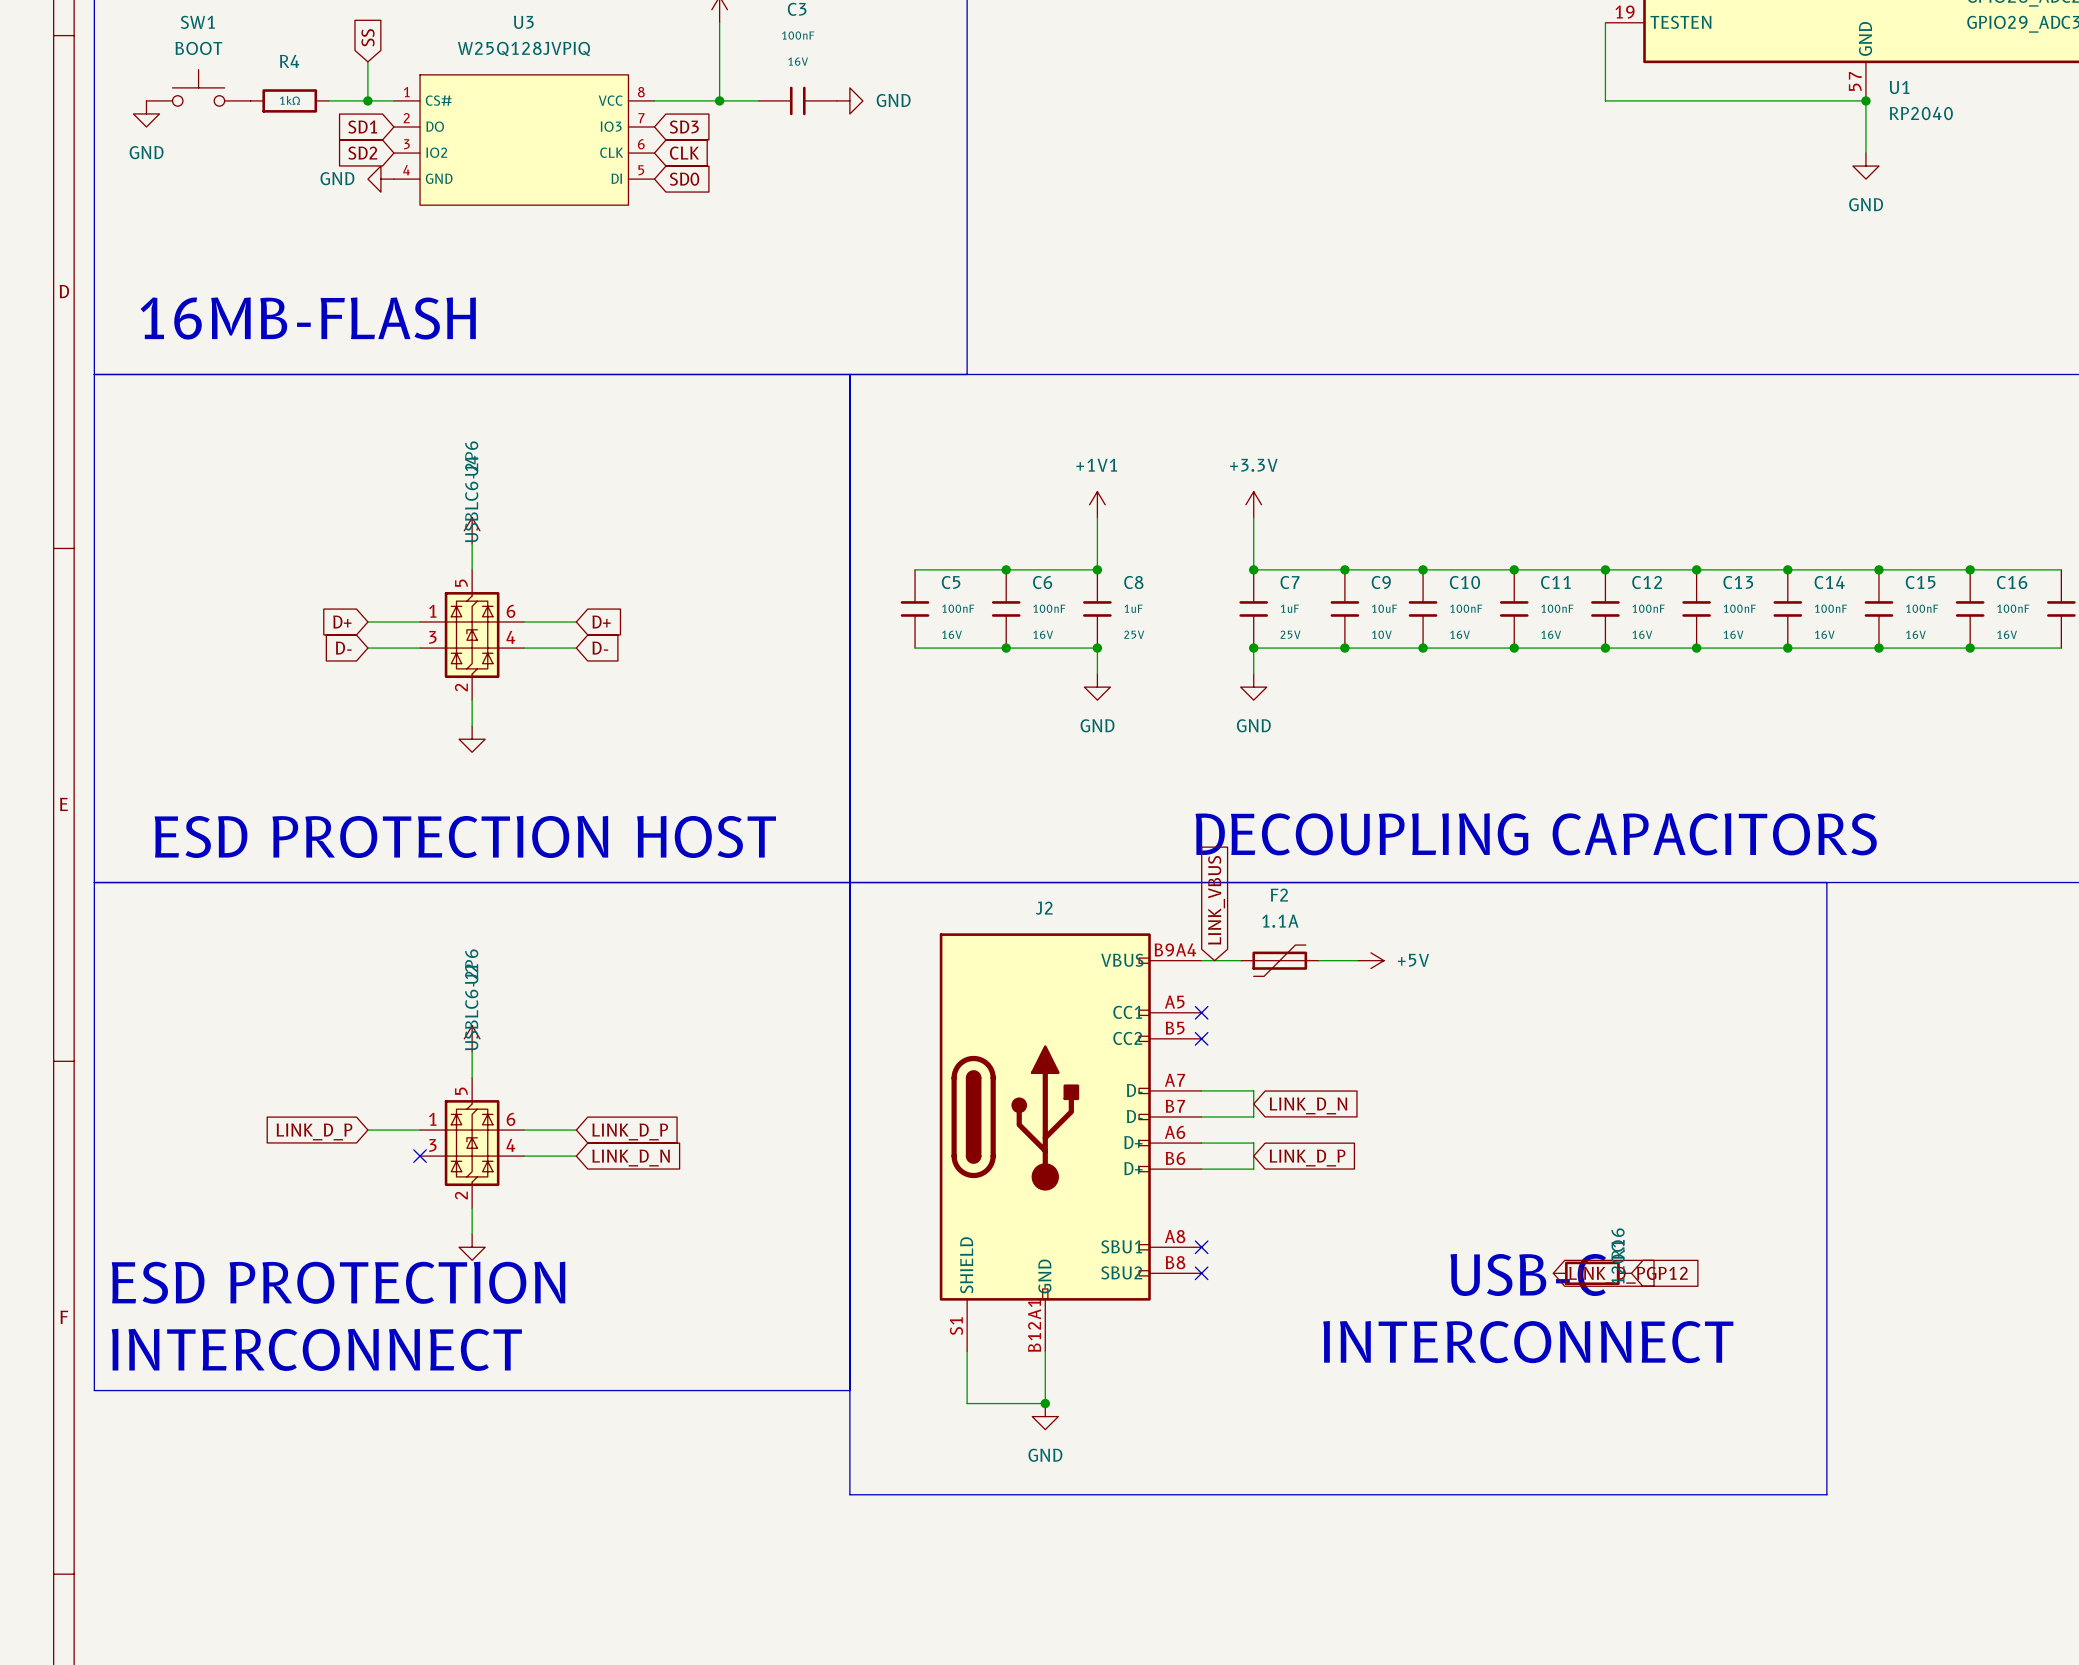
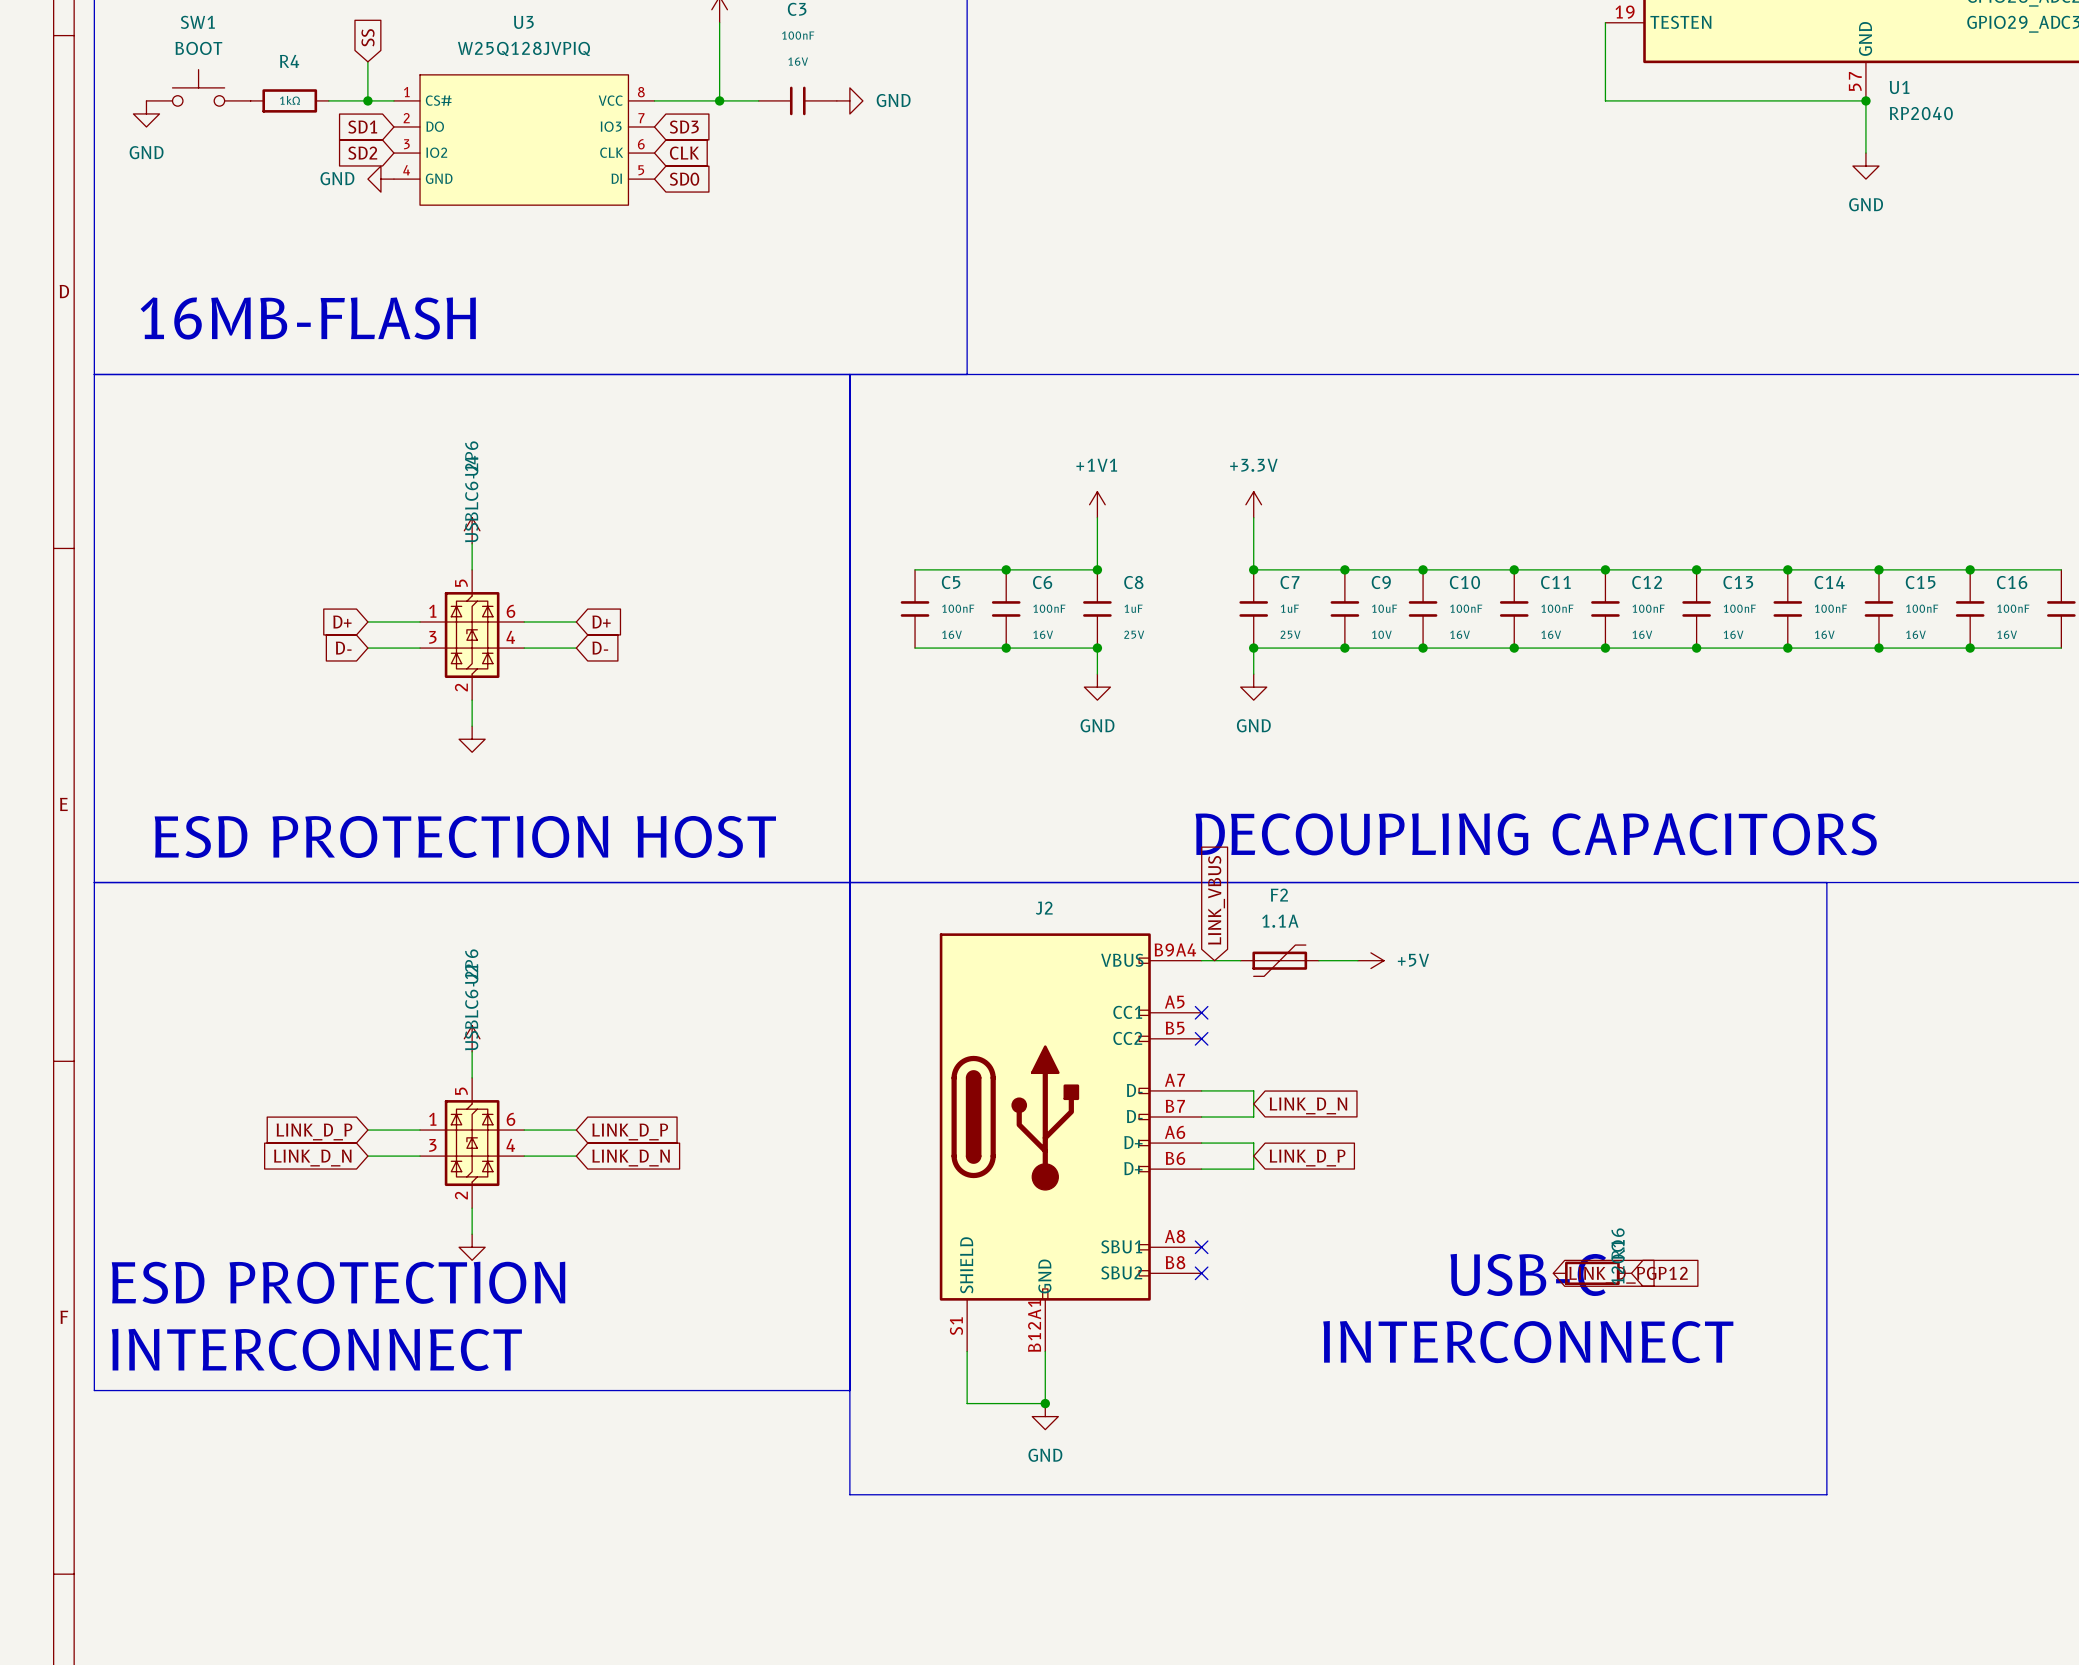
wire: none -> (367, 1156) (420, 1156)
no-connect mark: (420, 1156) -> none
global label: none -> LINK_D_N (312, 1158)

